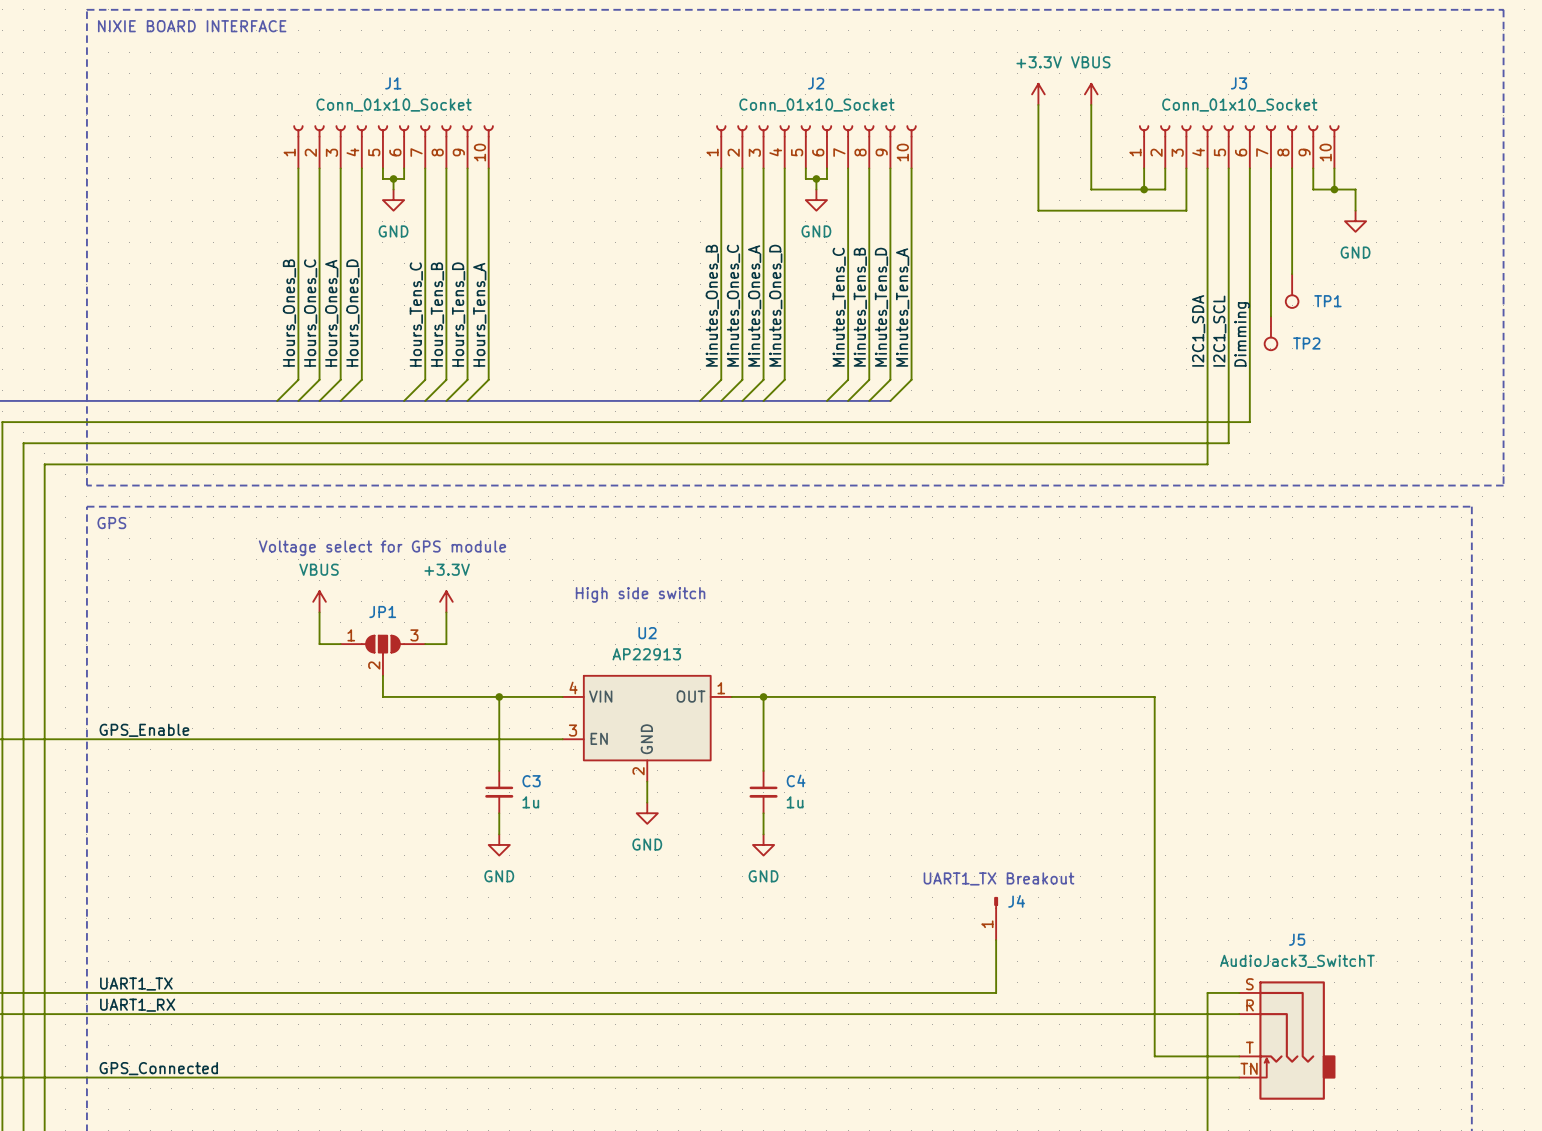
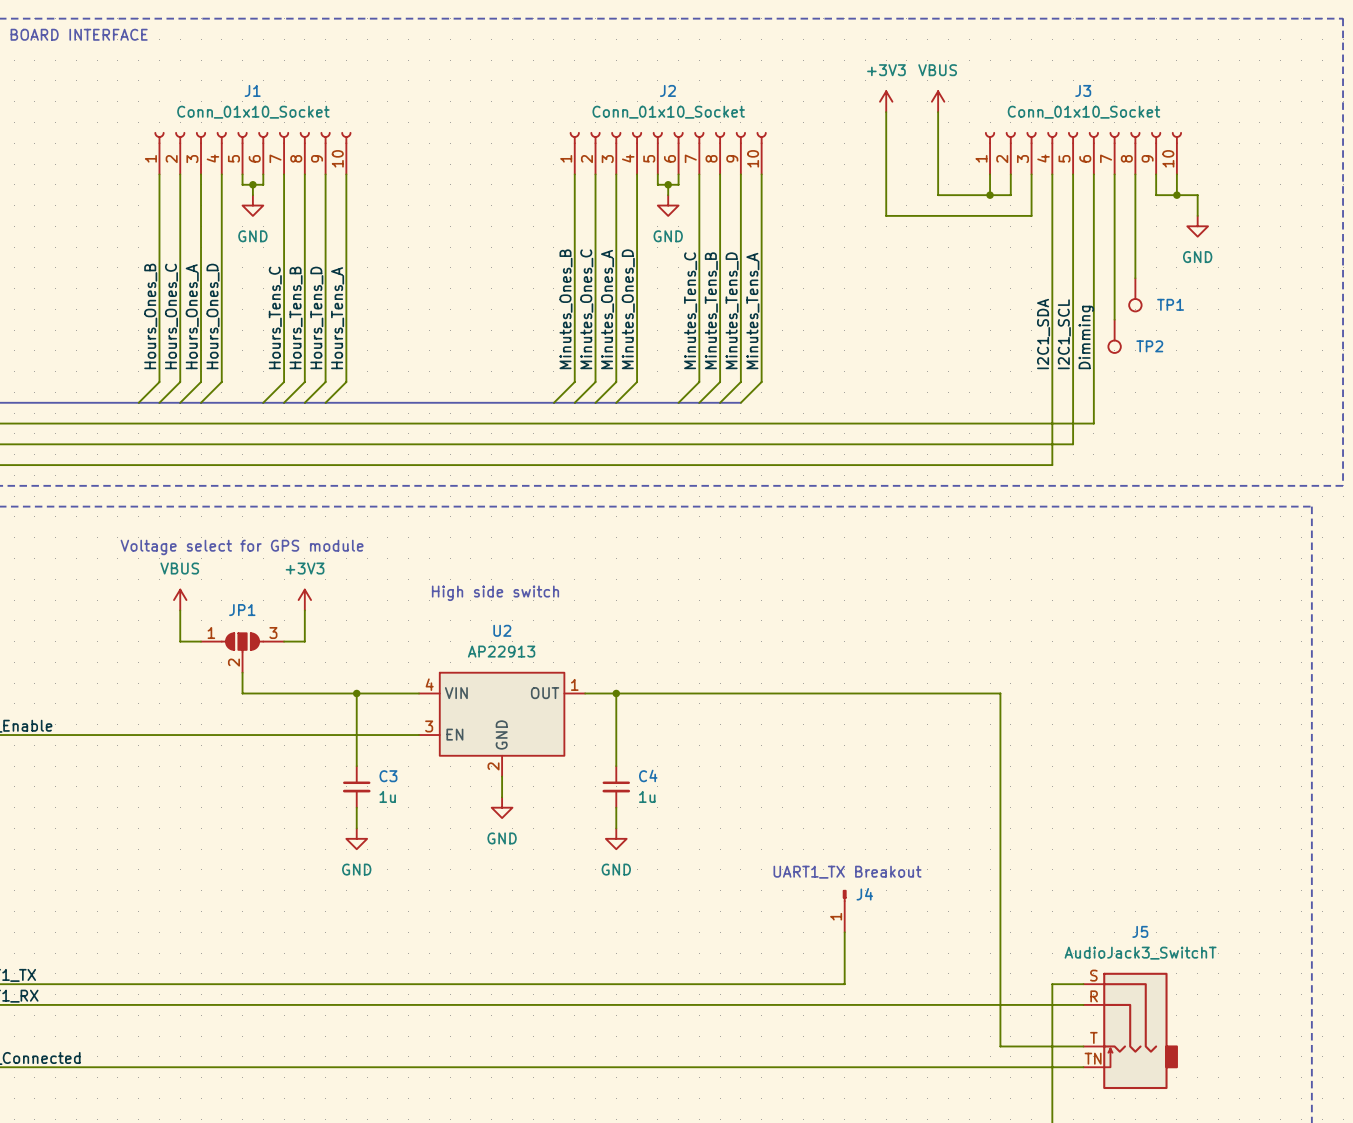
power symbol: +3.3V (1038, 94) -> +3V3 (886, 101)
power symbol: +3.3V (446, 601) -> +3V3 (304, 600)

